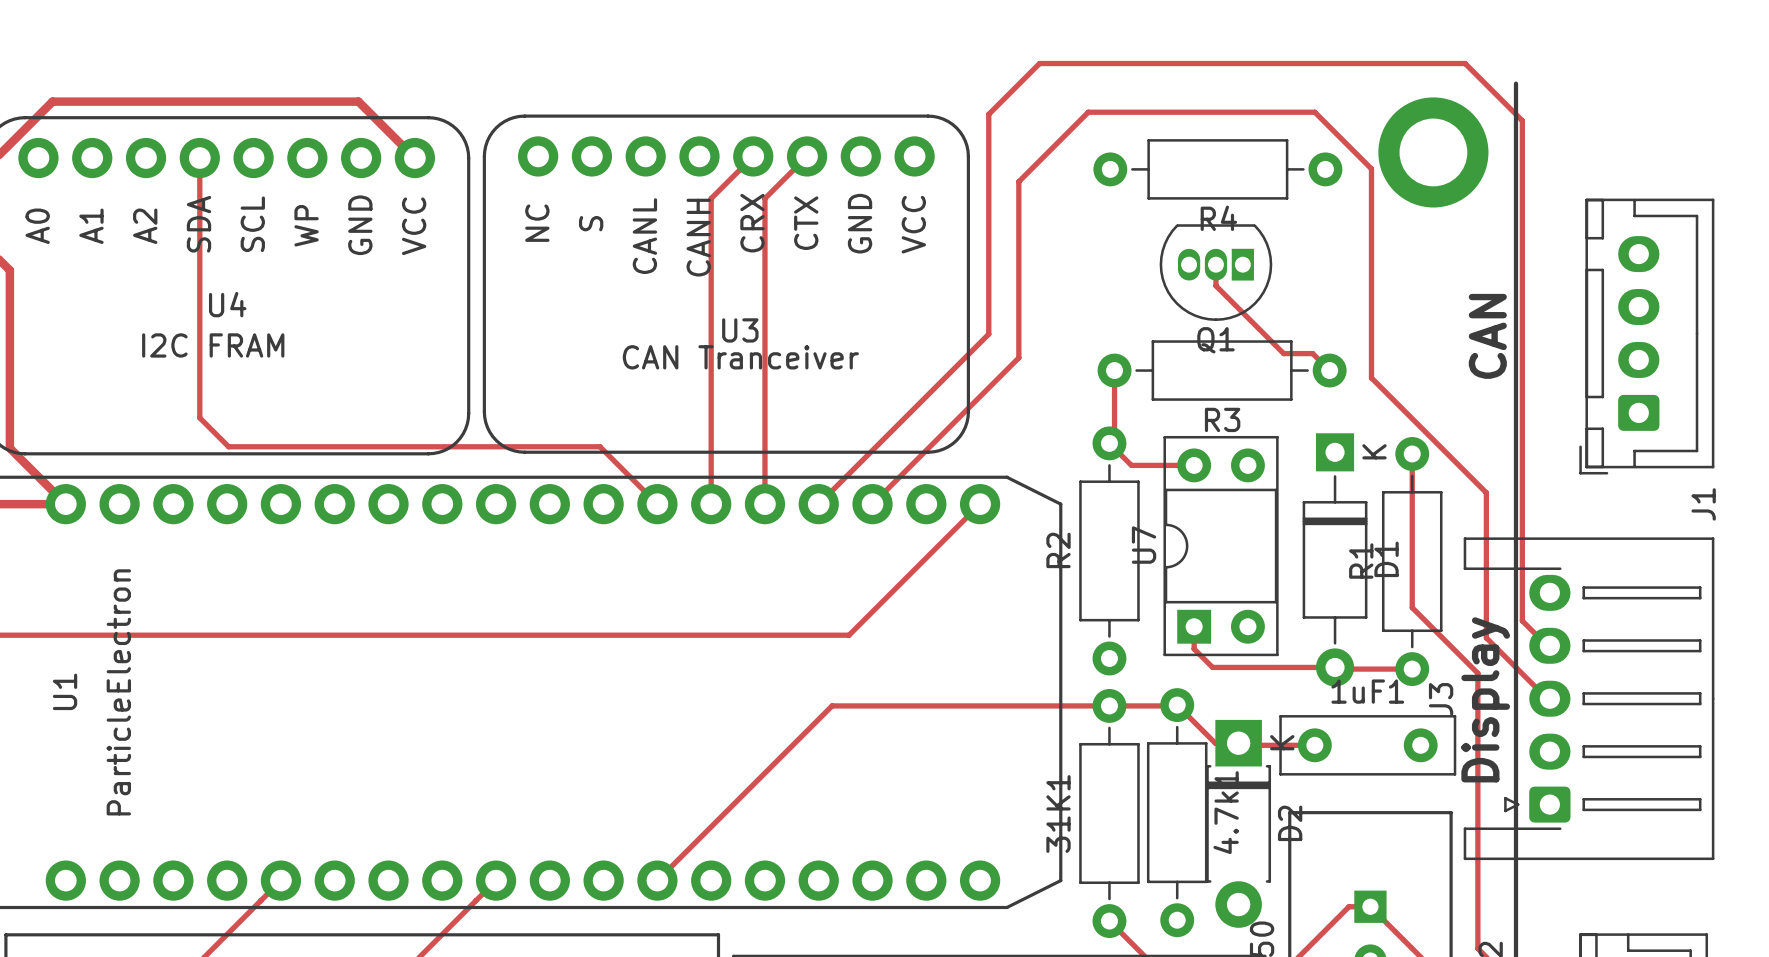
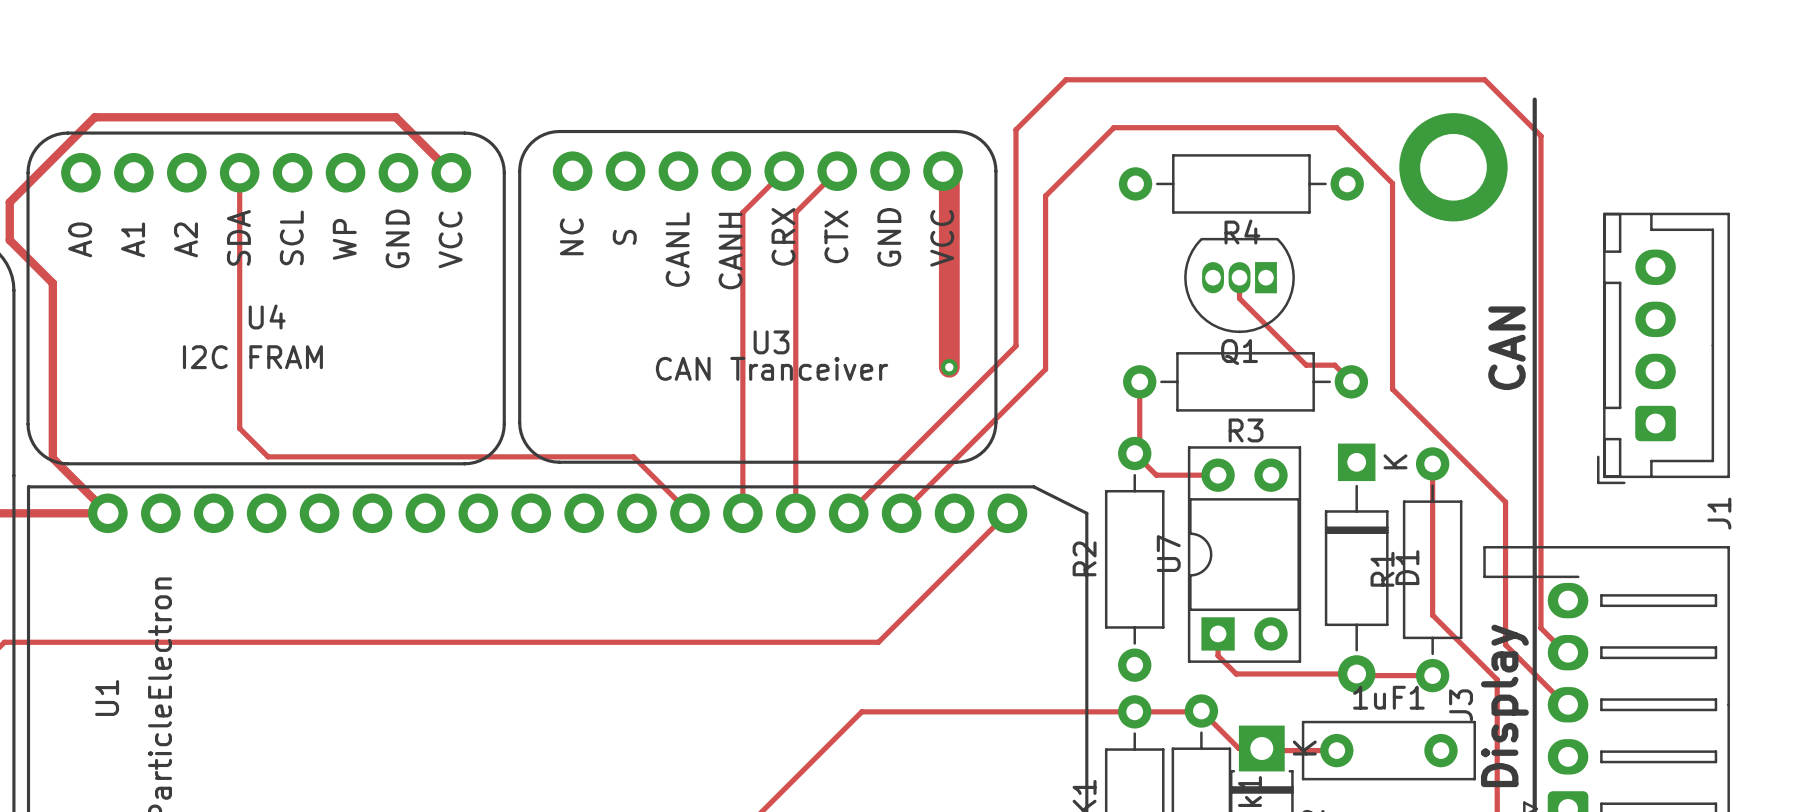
track: none -> (943, 171) (949, 177) (949, 367)
via: none -> (949, 367)

